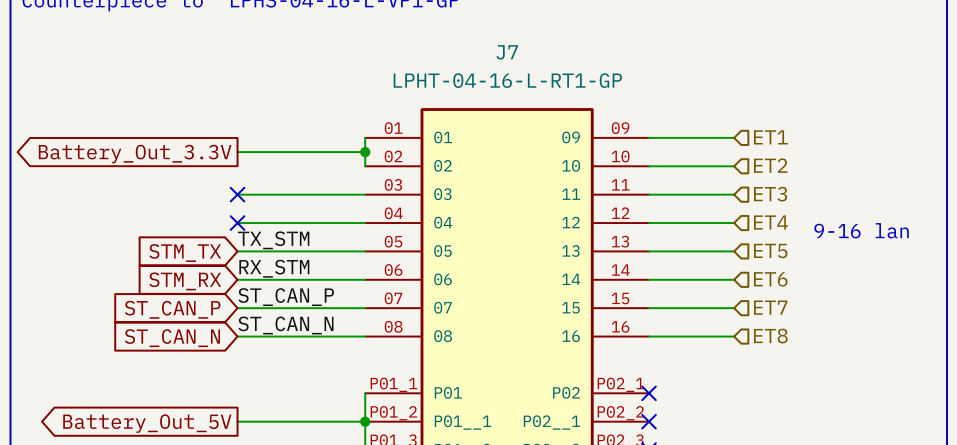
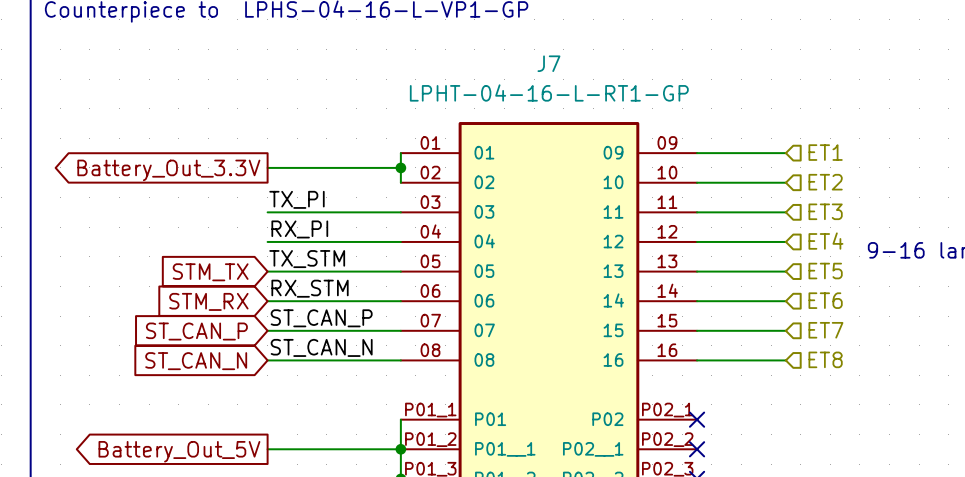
label: none -> TX_PI (296, 199)
no-connect mark: (237, 194) -> none
label: none -> RX_PI (299, 229)
no-connect mark: (237, 223) -> none

